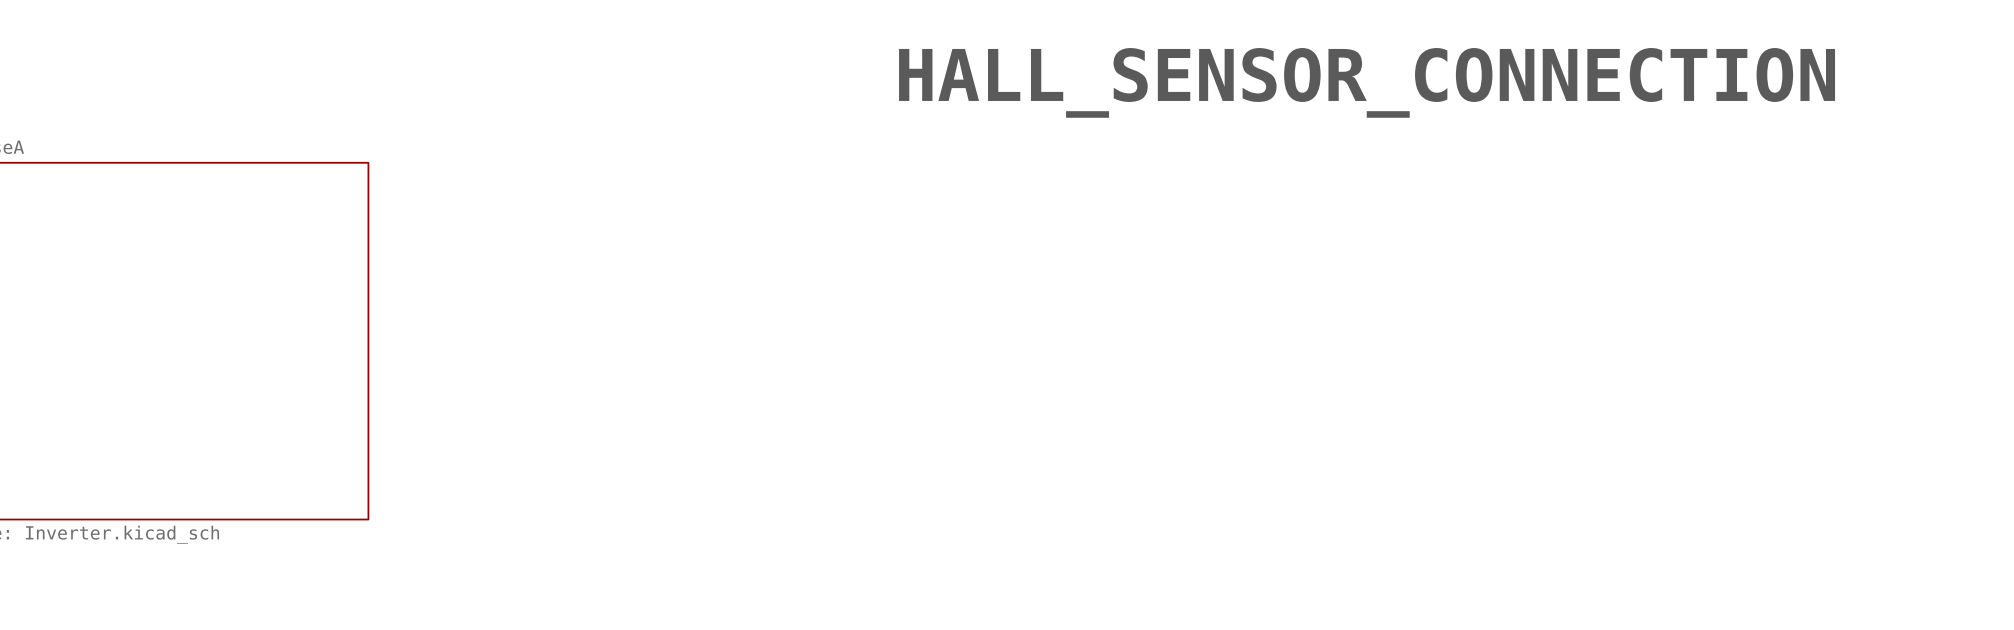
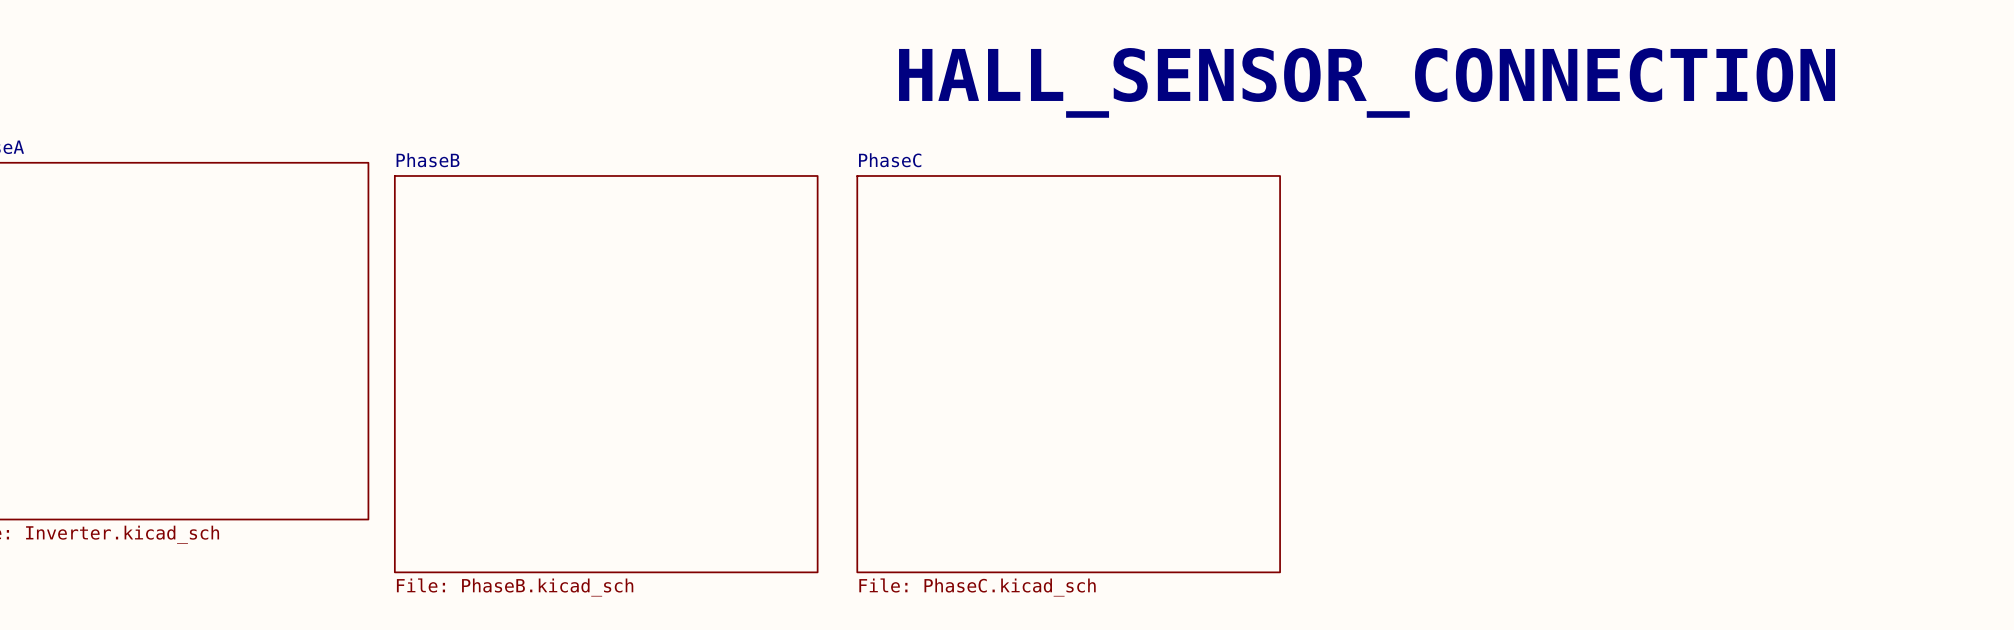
sheet PhaseB: none -> File: PhaseB.kicad_sch (606, 374)
sheet PhaseC: none -> File: PhaseC.kicad_sch (1068, 374)

